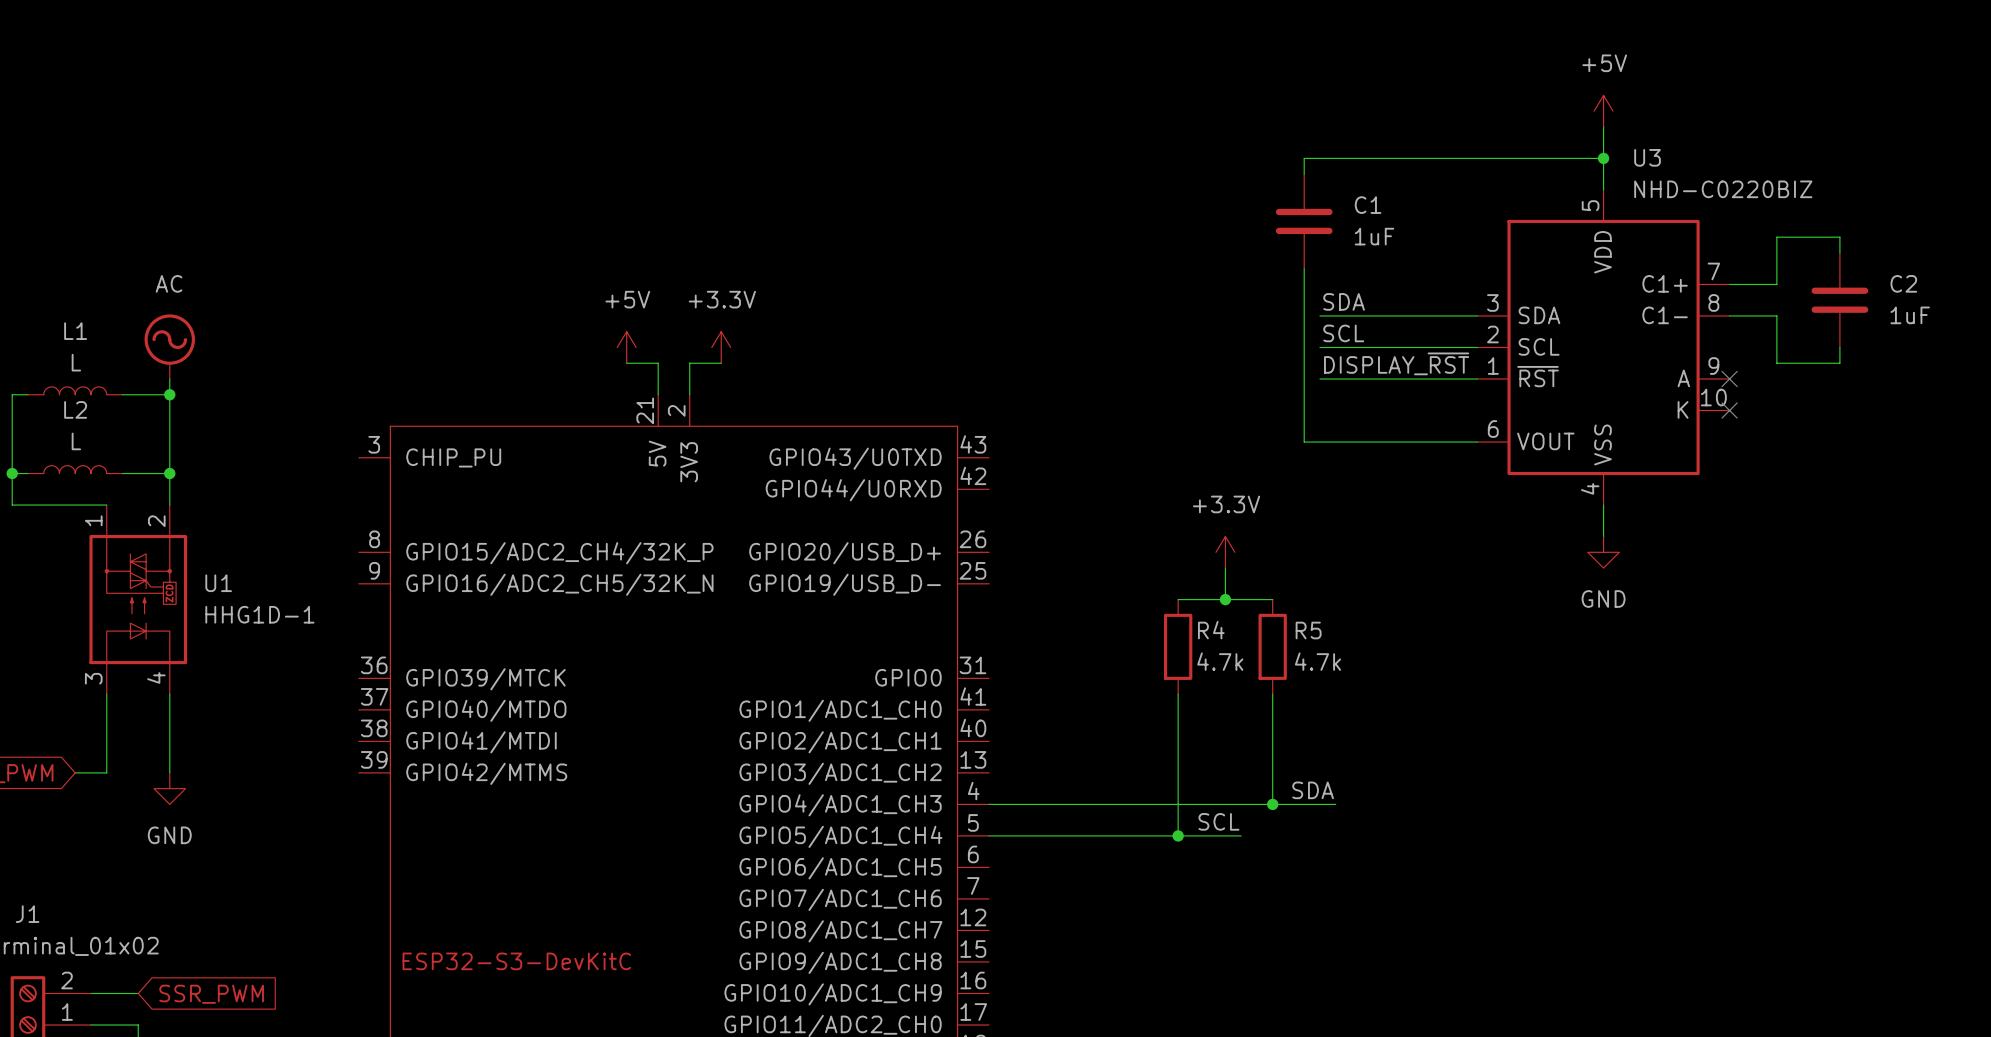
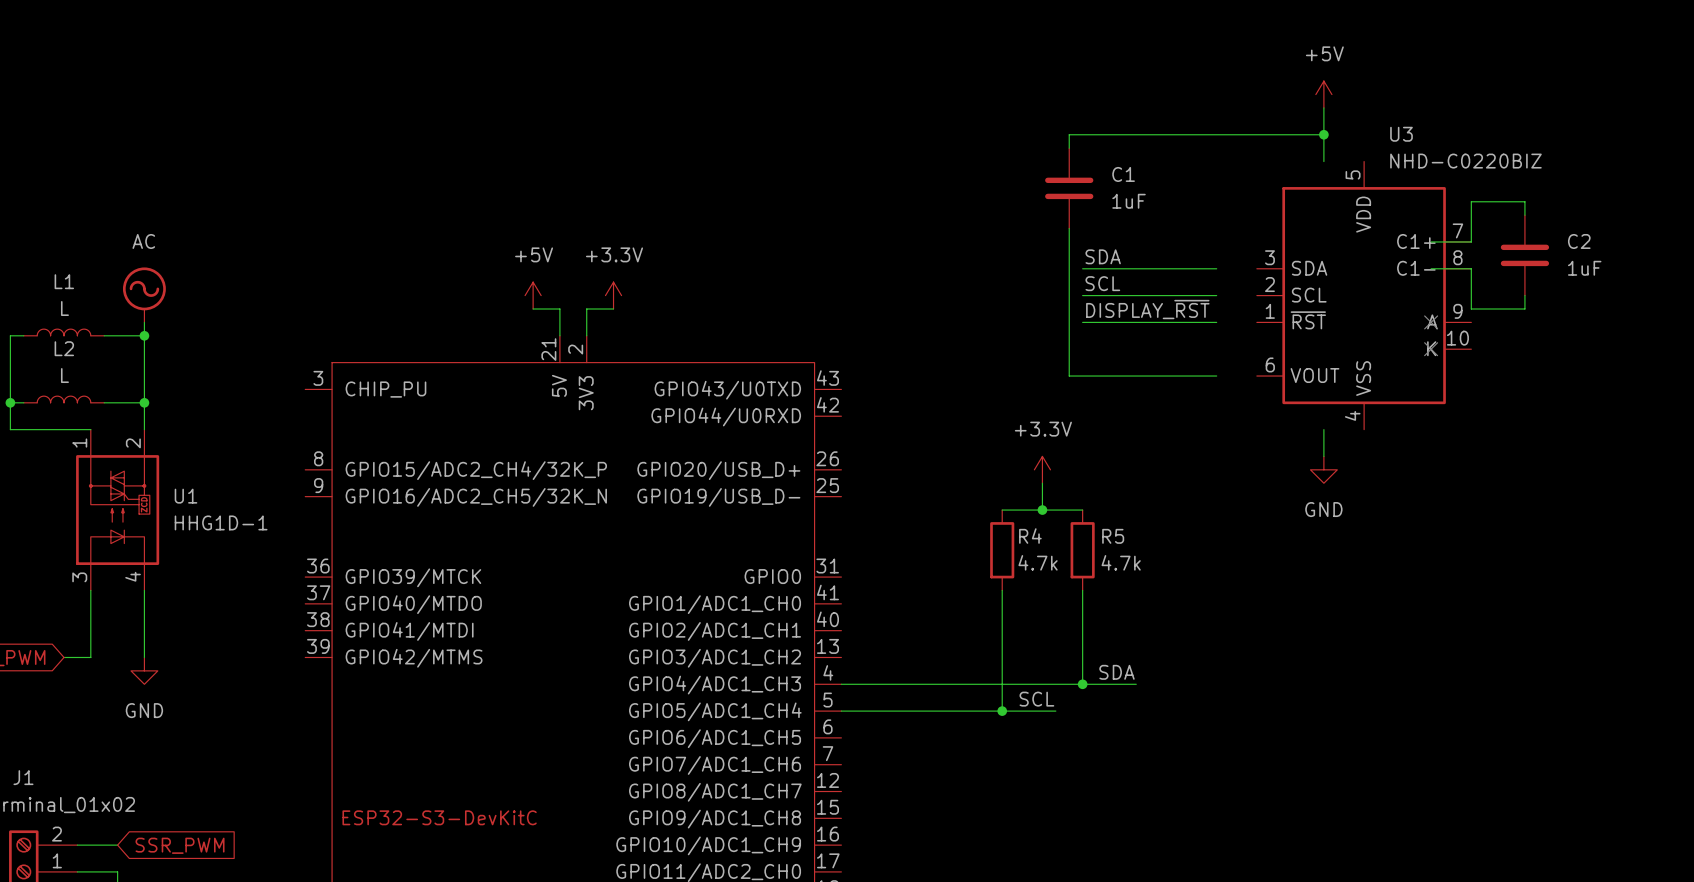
power symbol position: +5V (1603, 111) -> +5V (1323, 94)
wire: (1603, 126) (1603, 189) -> (1323, 107) (1323, 161)
wire: (1304, 158) (1304, 174) -> (1109, 134) (1069, 134) (1069, 148)
wire: (1556, 158) (1603, 158) -> none
junction position: (1603, 158) -> (1323, 134)
C1 position: (1304, 221) -> (1069, 188)
wire: (1776, 237) (1776, 284) (1729, 284) -> (1511, 201) (1471, 201) (1471, 241) (1431, 241)
wire: (1792, 237) (1839, 237) (1839, 252) -> (1524, 201) (1524, 215)
wire: (1304, 268) (1304, 442) -> (1069, 228) (1069, 376) (1109, 376)
C2 position: (1839, 300) -> (1524, 255)
label position: SDA (1344, 301) -> SDA (1103, 256)
wire: (1430, 315) (1477, 315) -> (1082, 268) (1122, 268)
wire: (1729, 315) (1776, 315) (1776, 363) -> (1431, 268) (1471, 268) (1471, 309) (1511, 309)
label position: SCL (1343, 333) -> SCL (1102, 283)
wire: (1430, 347) (1477, 347) -> (1082, 295) (1122, 295)
wire: (1839, 347) (1839, 363) (1792, 363) -> (1524, 295) (1524, 309)
label position: DISPLAY_~{RST} (1396, 363) -> DISPLAY_~{RST} (1147, 309)
wire: (1430, 379) (1477, 379) -> (1082, 322) (1122, 322)
no-connect mark: none -> (1431, 322)
no-connect mark: (1729, 379) -> none
no-connect mark: none -> (1431, 349)
no-connect mark: (1729, 410) -> none
wire: (1430, 442) (1477, 442) -> none
wire: (1603, 505) (1603, 536) -> (1323, 429) (1323, 456)
power symbol position: GND (1603, 552) -> GND (1323, 469)

